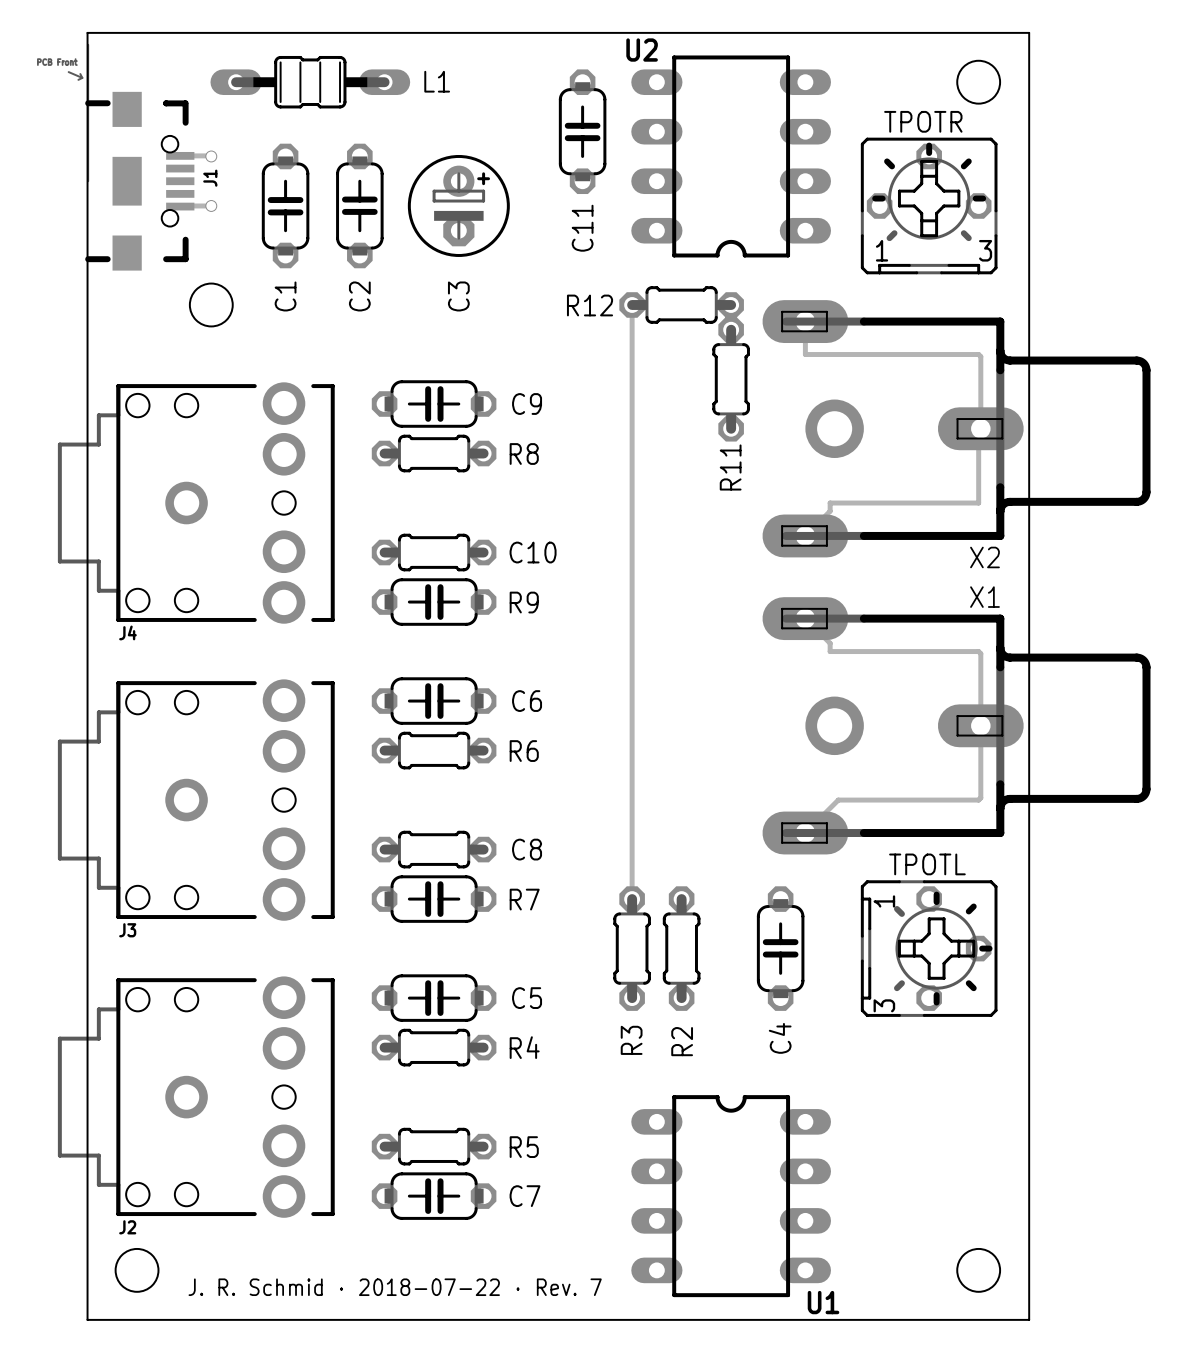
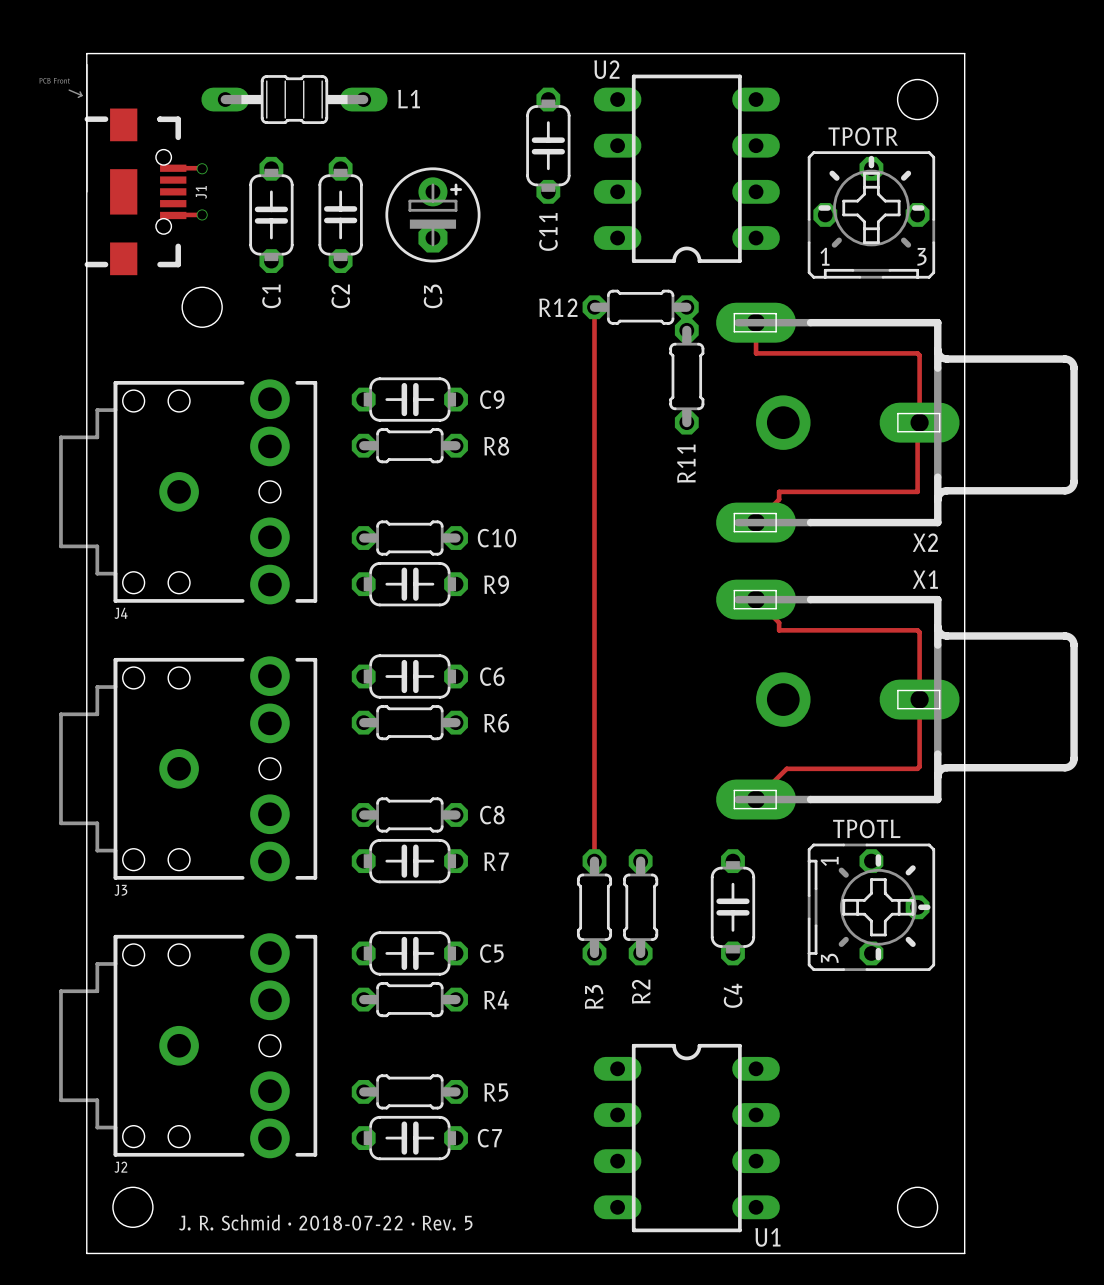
text: J. R. Schmid · 2018-07-22 · Rev. 7 (395, 1287) -> J. R. Schmid · 2018-07-22 · Rev. 5 (325, 1222)

